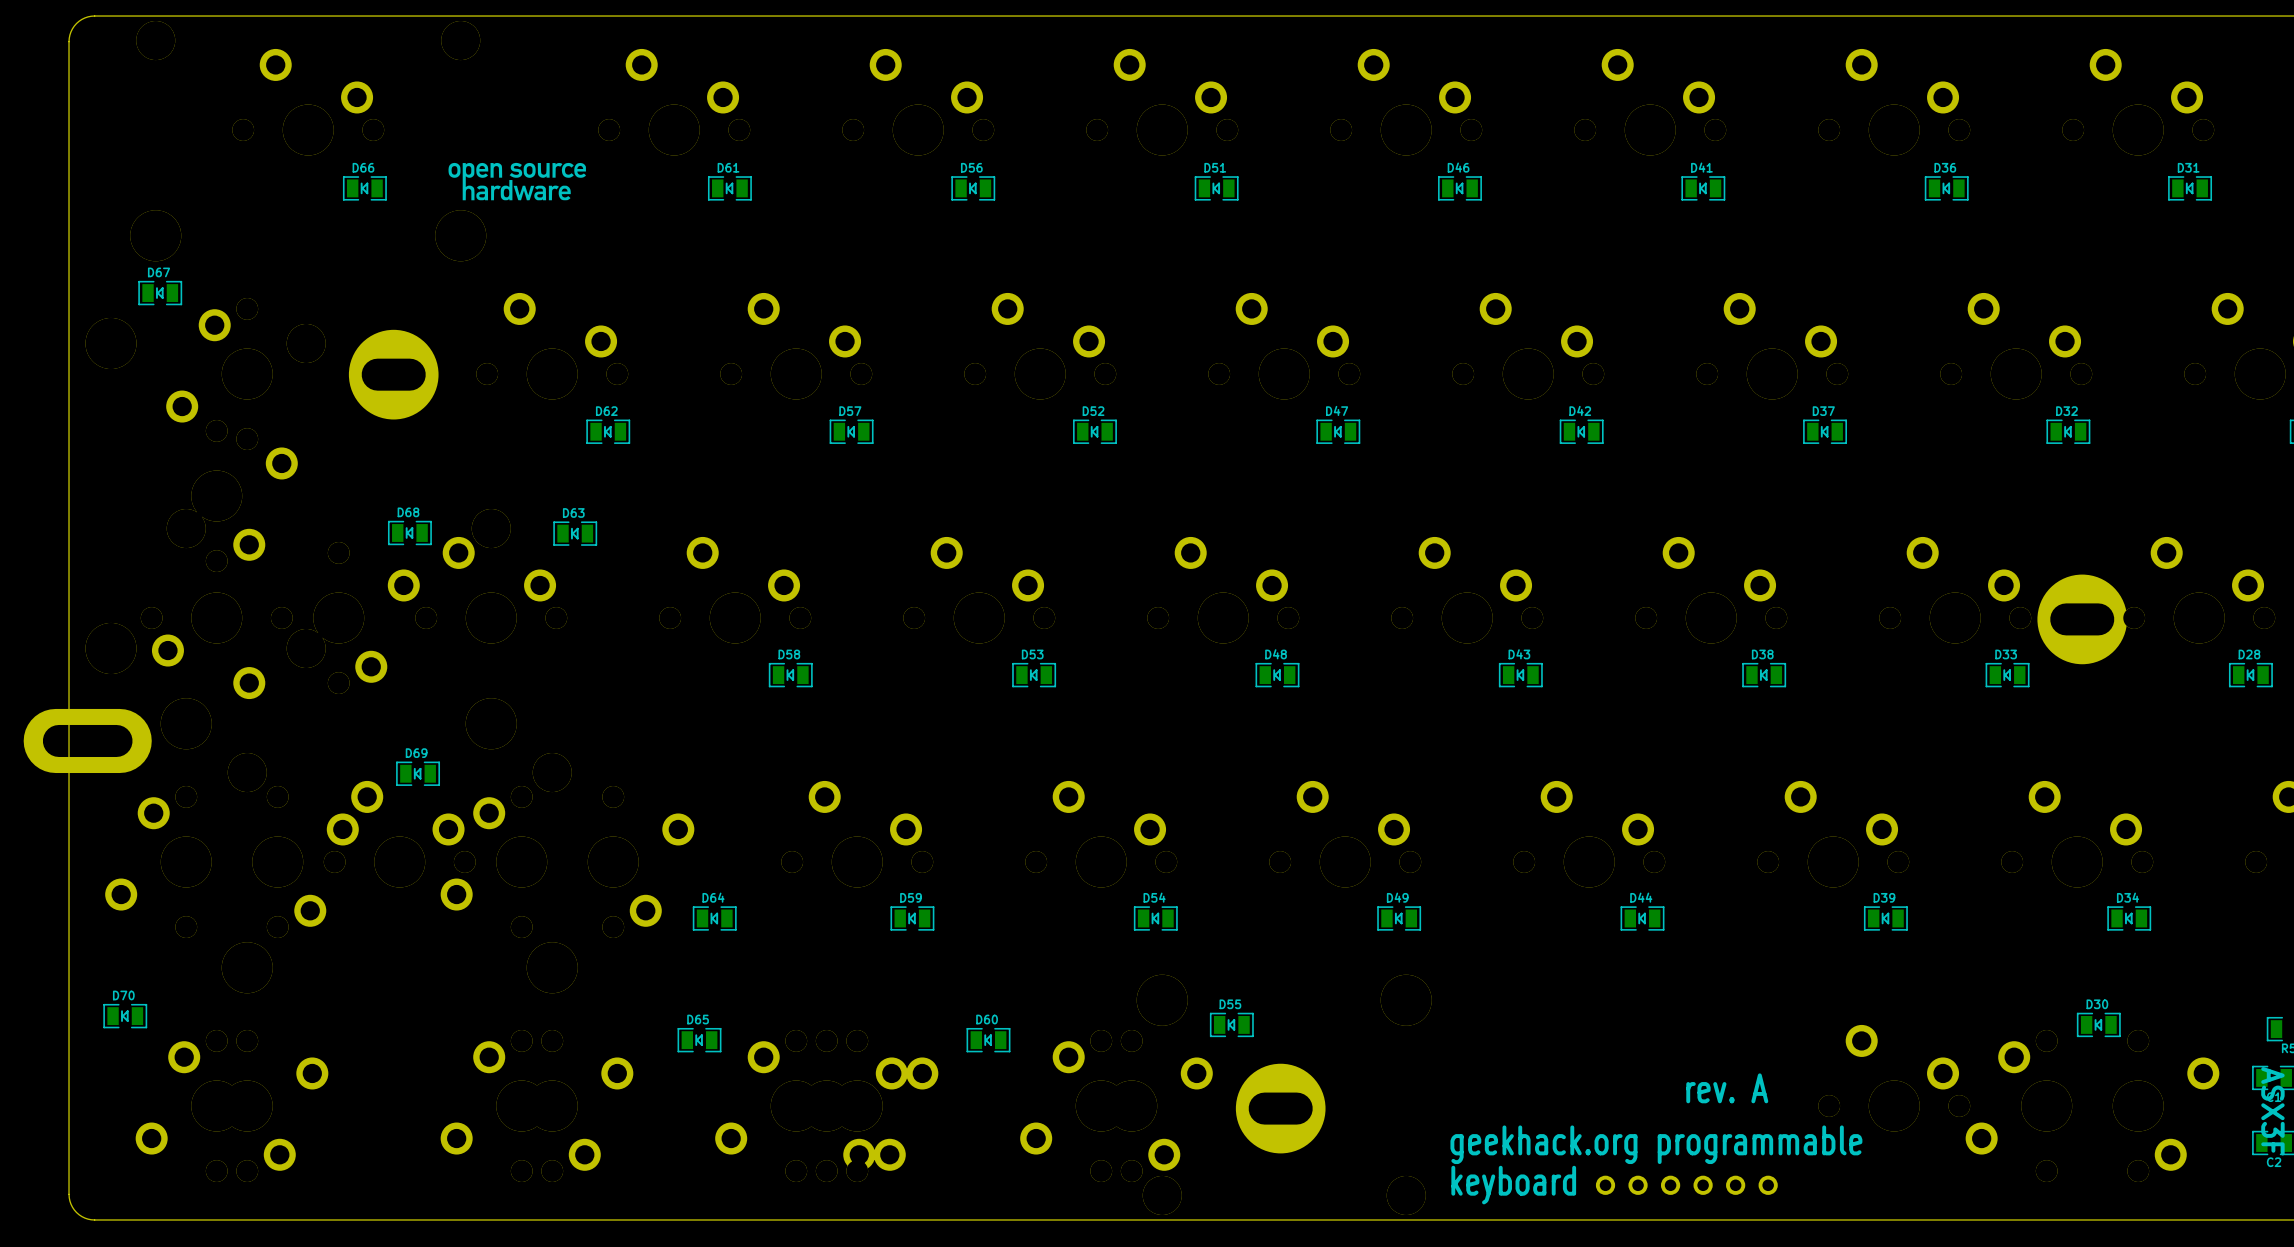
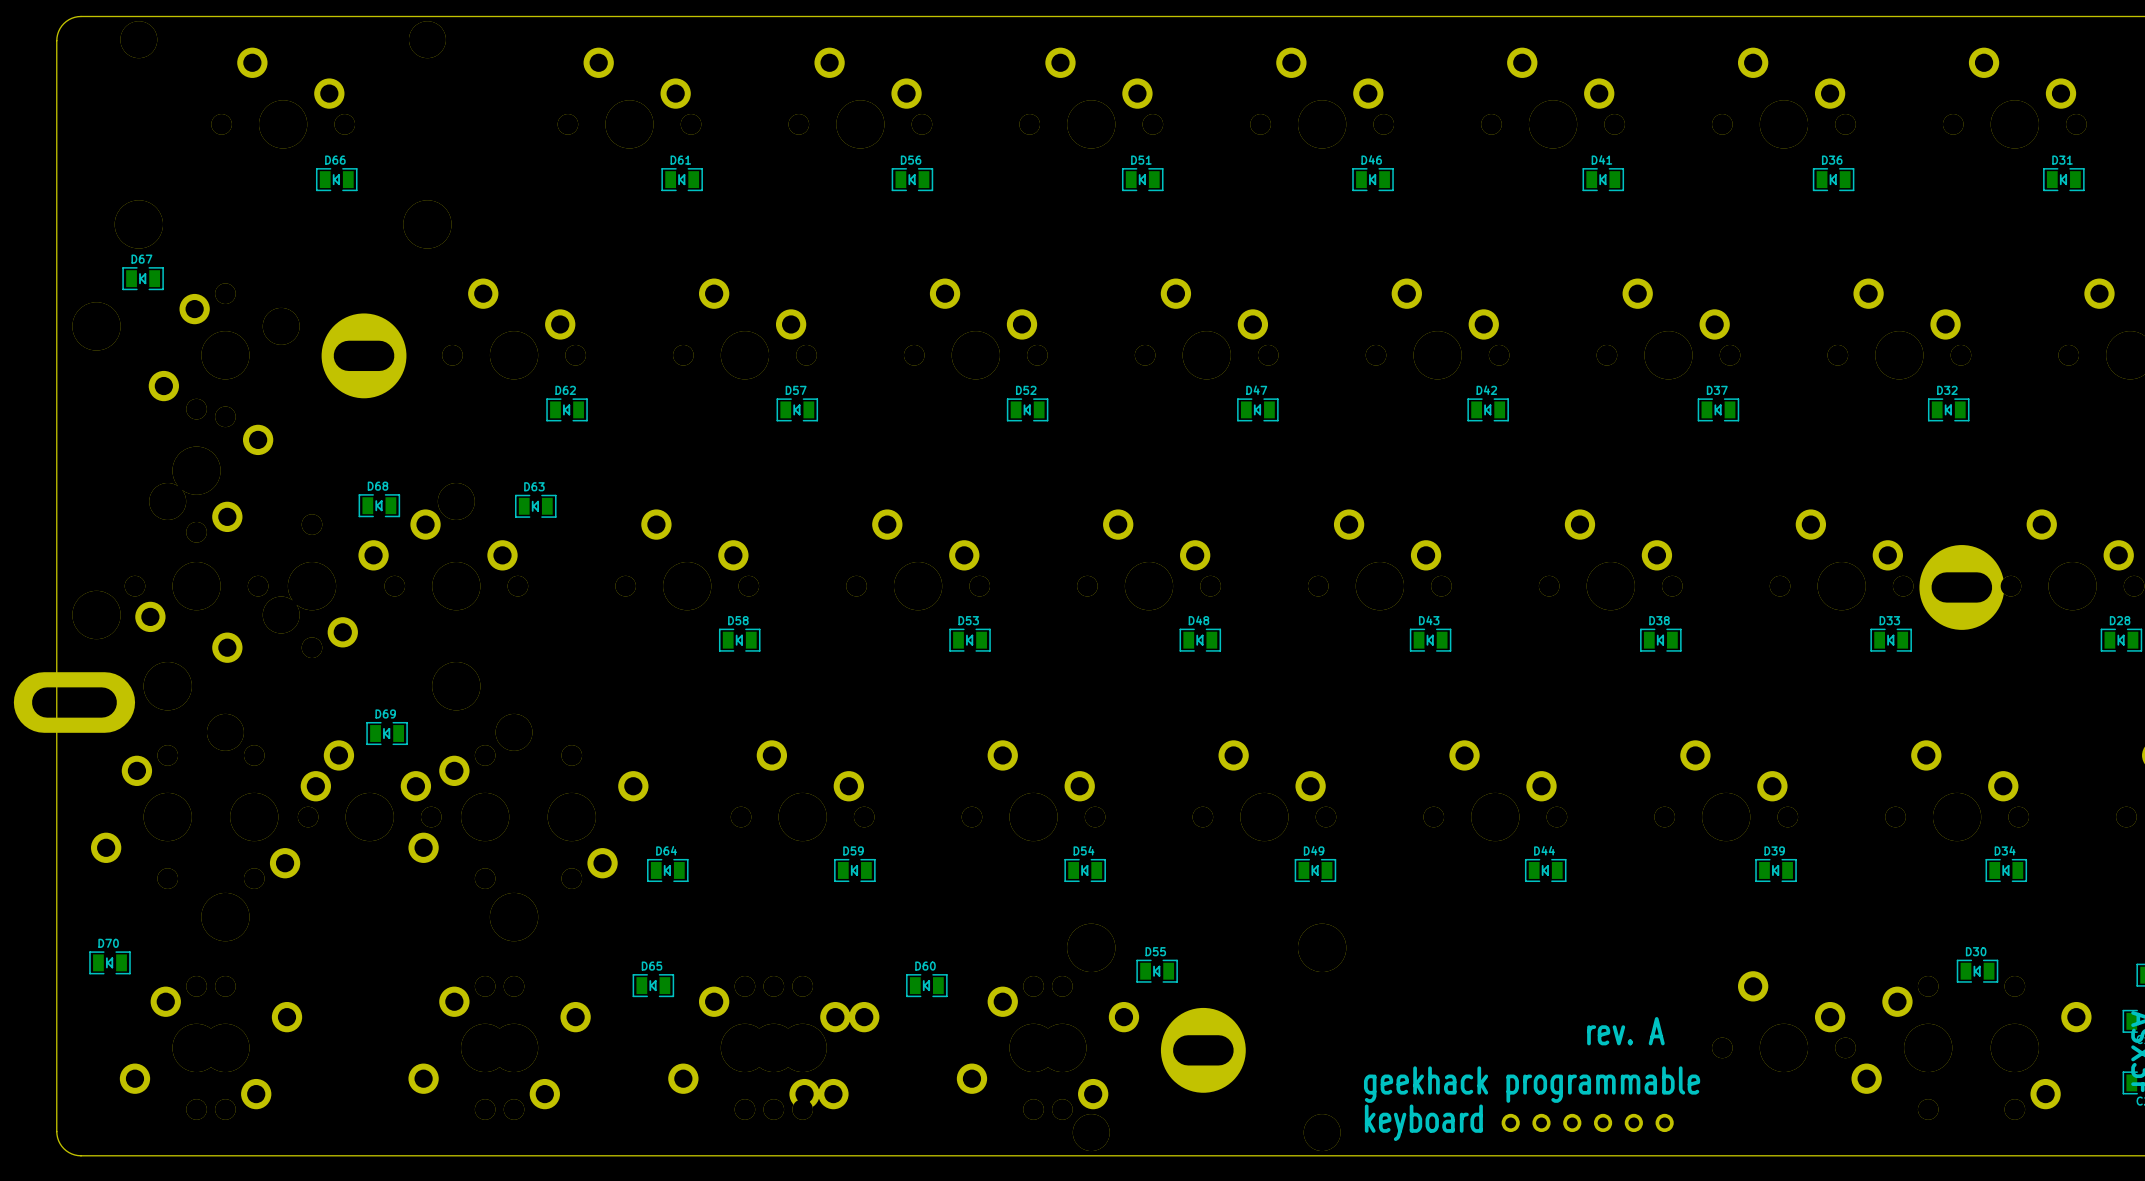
drawing: [448, 162, 586, 201] -> none
text: geekhack.org programmable (1656, 1144) -> geekhack programmable (1532, 1084)

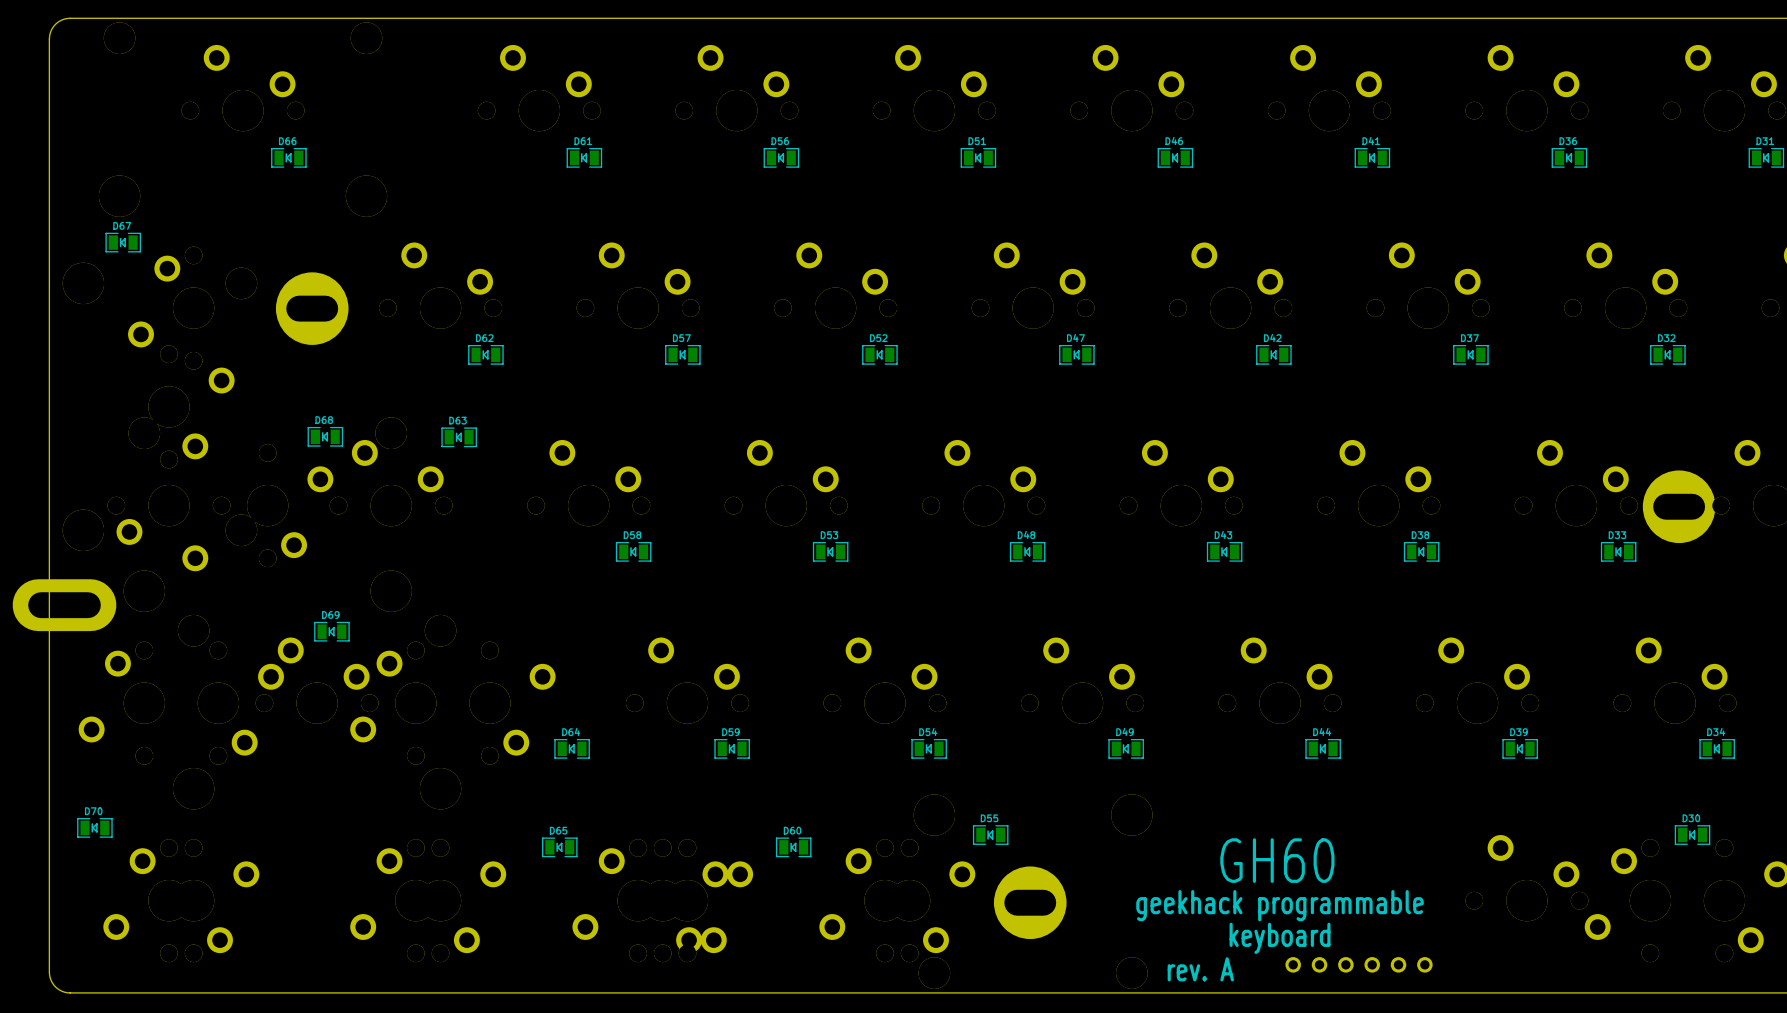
text: none -> GH60 (1277, 860)
text position: rev. A (1625, 1031) -> rev. A (1200, 969)
text position: geekhack programmable (1532, 1084) -> geekhack programmable (1280, 905)
text position: keyboard (1423, 1122) -> keyboard (1280, 938)

